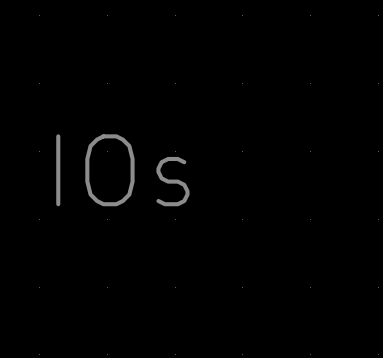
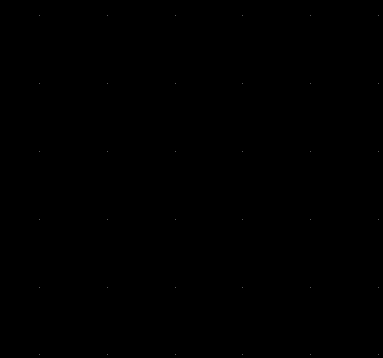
text: IOs (122, 170) -> none

